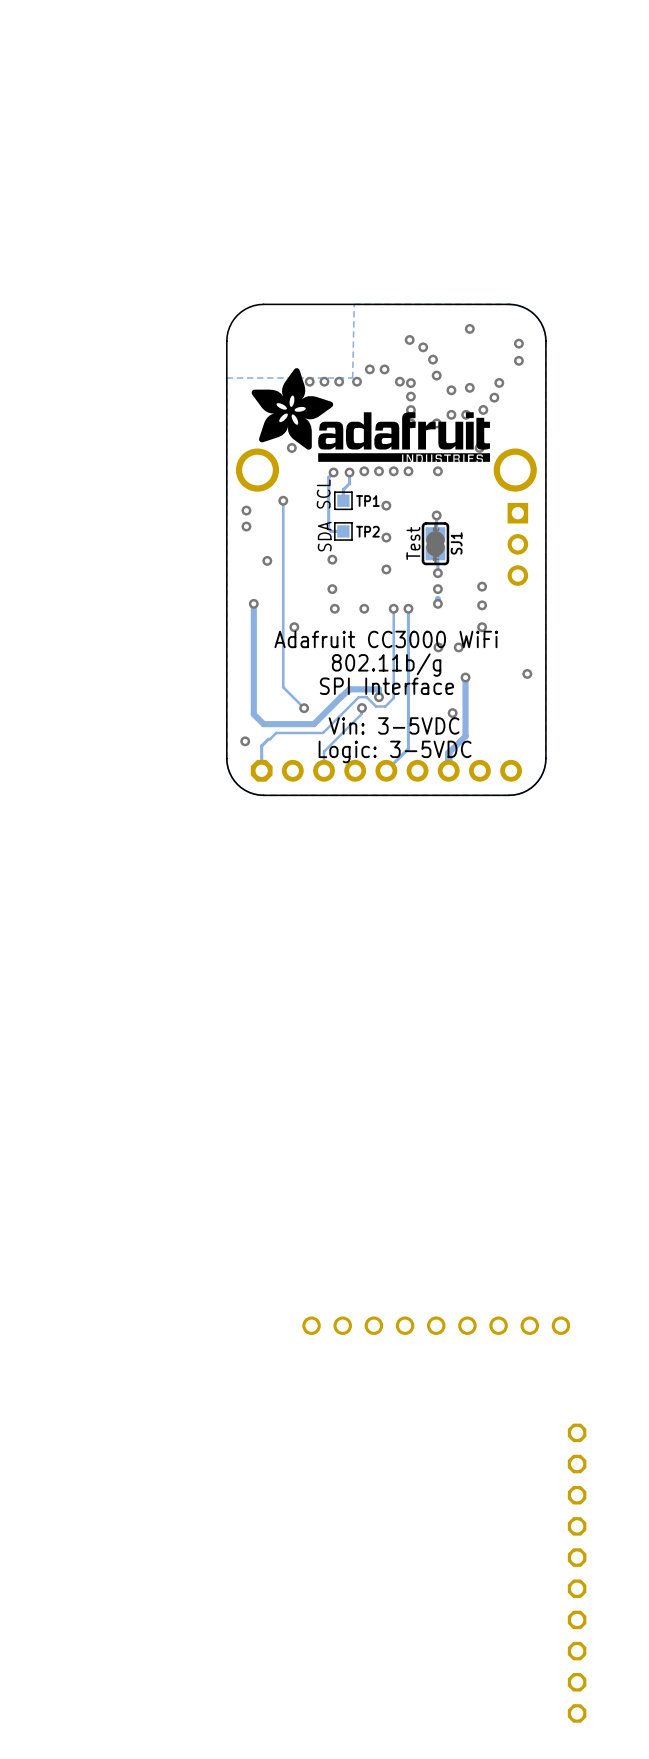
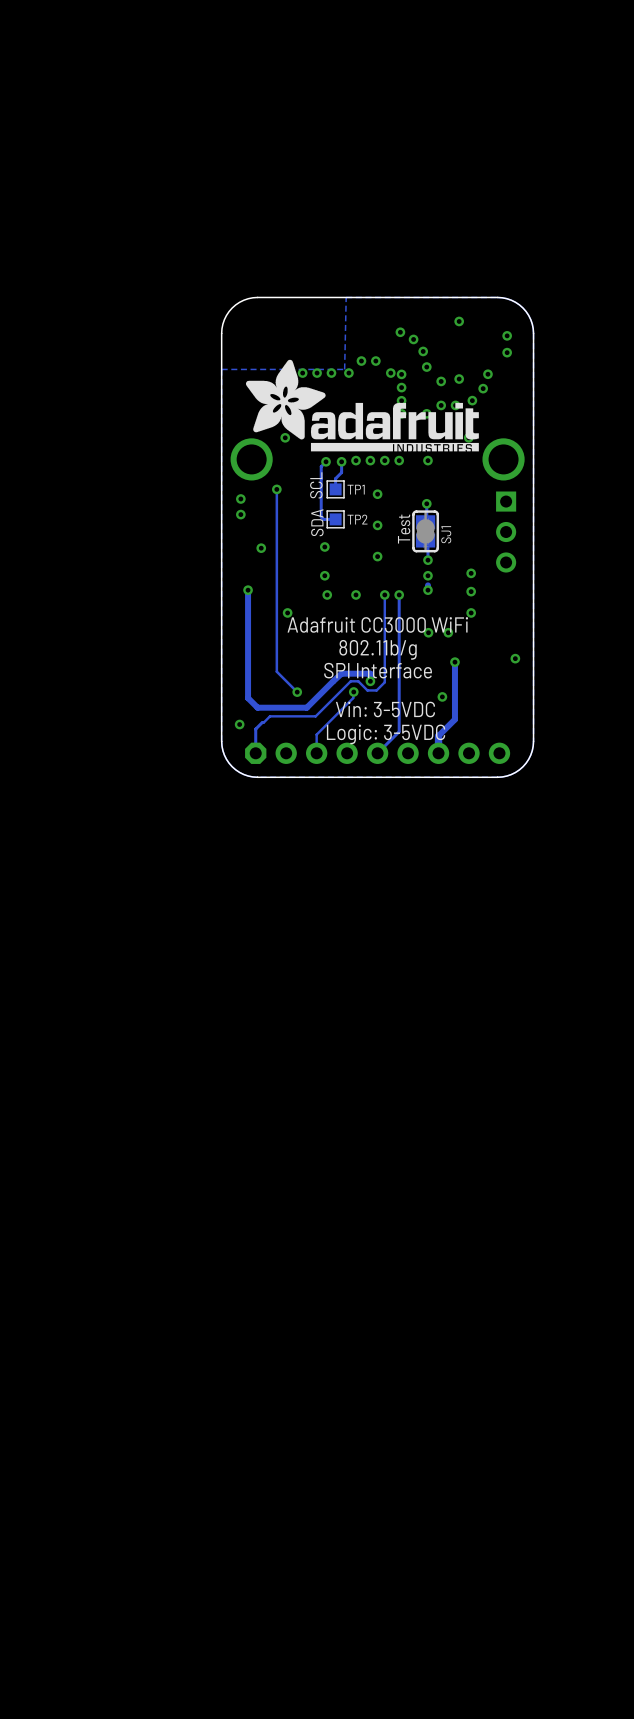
part: (436, 1325) -> none
part: (577, 1573) -> none

